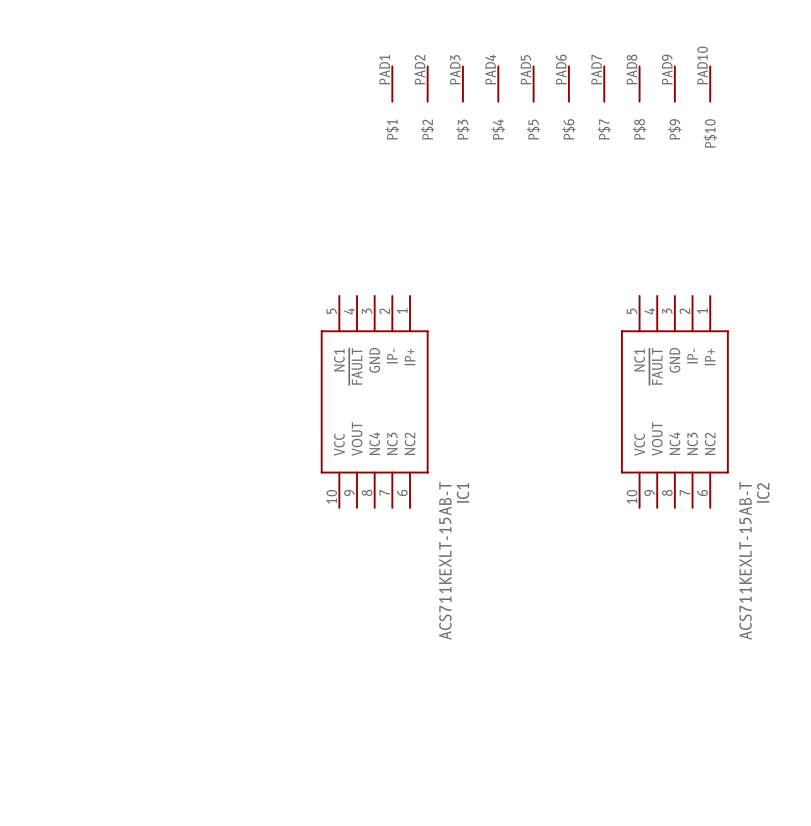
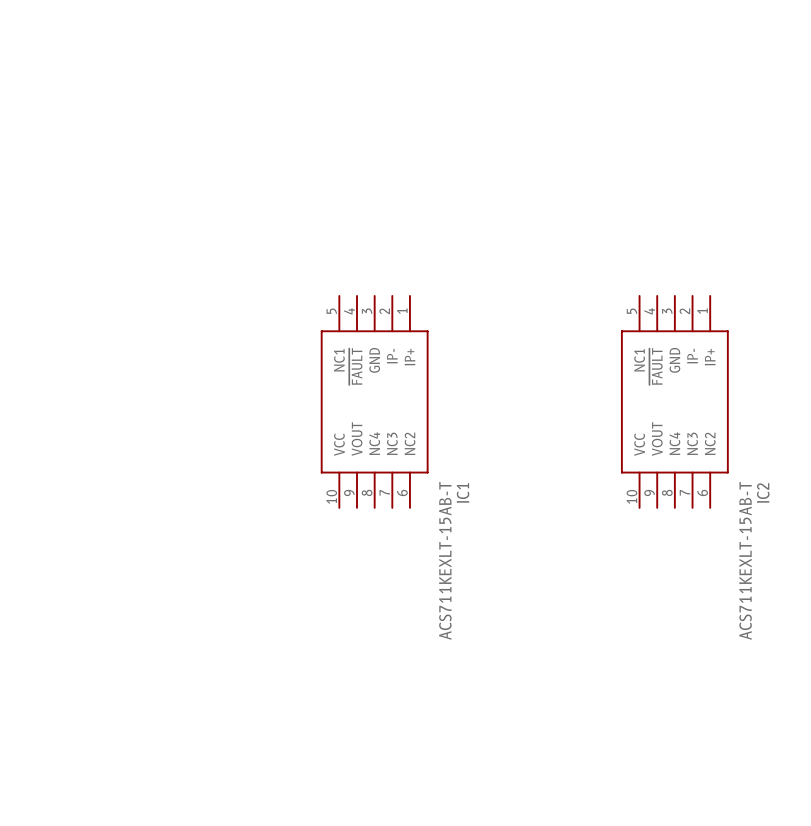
part: (551, 84) -> none

